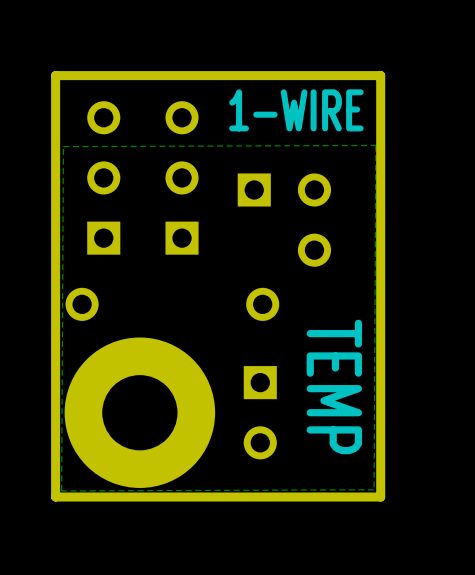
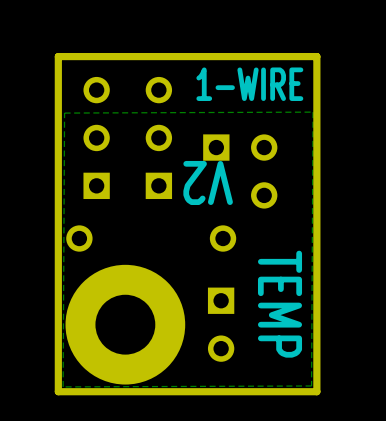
text: none -> V2 (208, 182)

